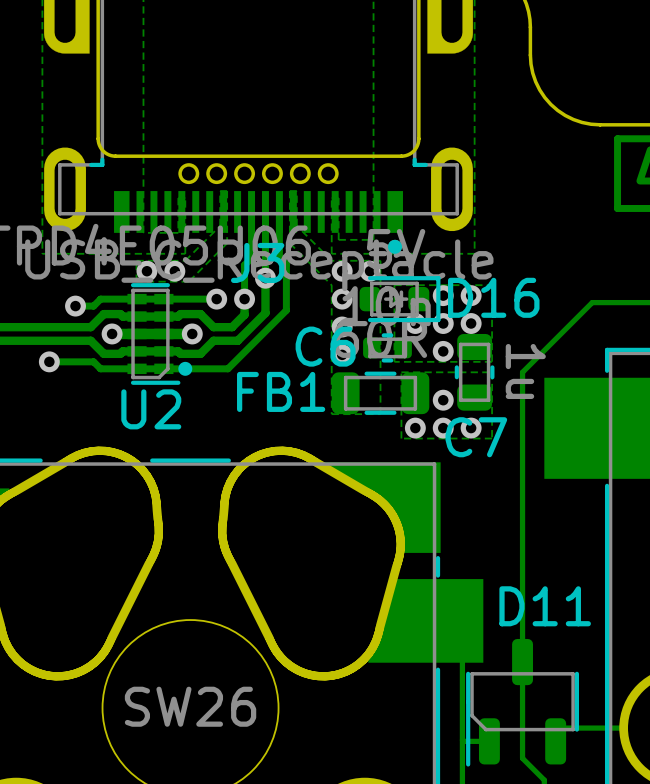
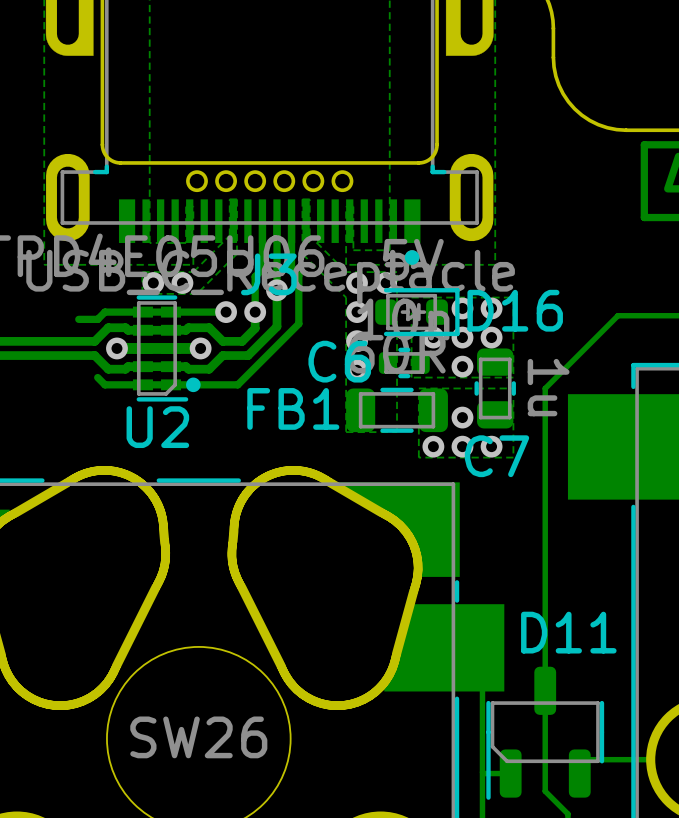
via: (75, 306) -> none
via: (49, 361) -> none
track: (93, 361) (49, 361) -> none

